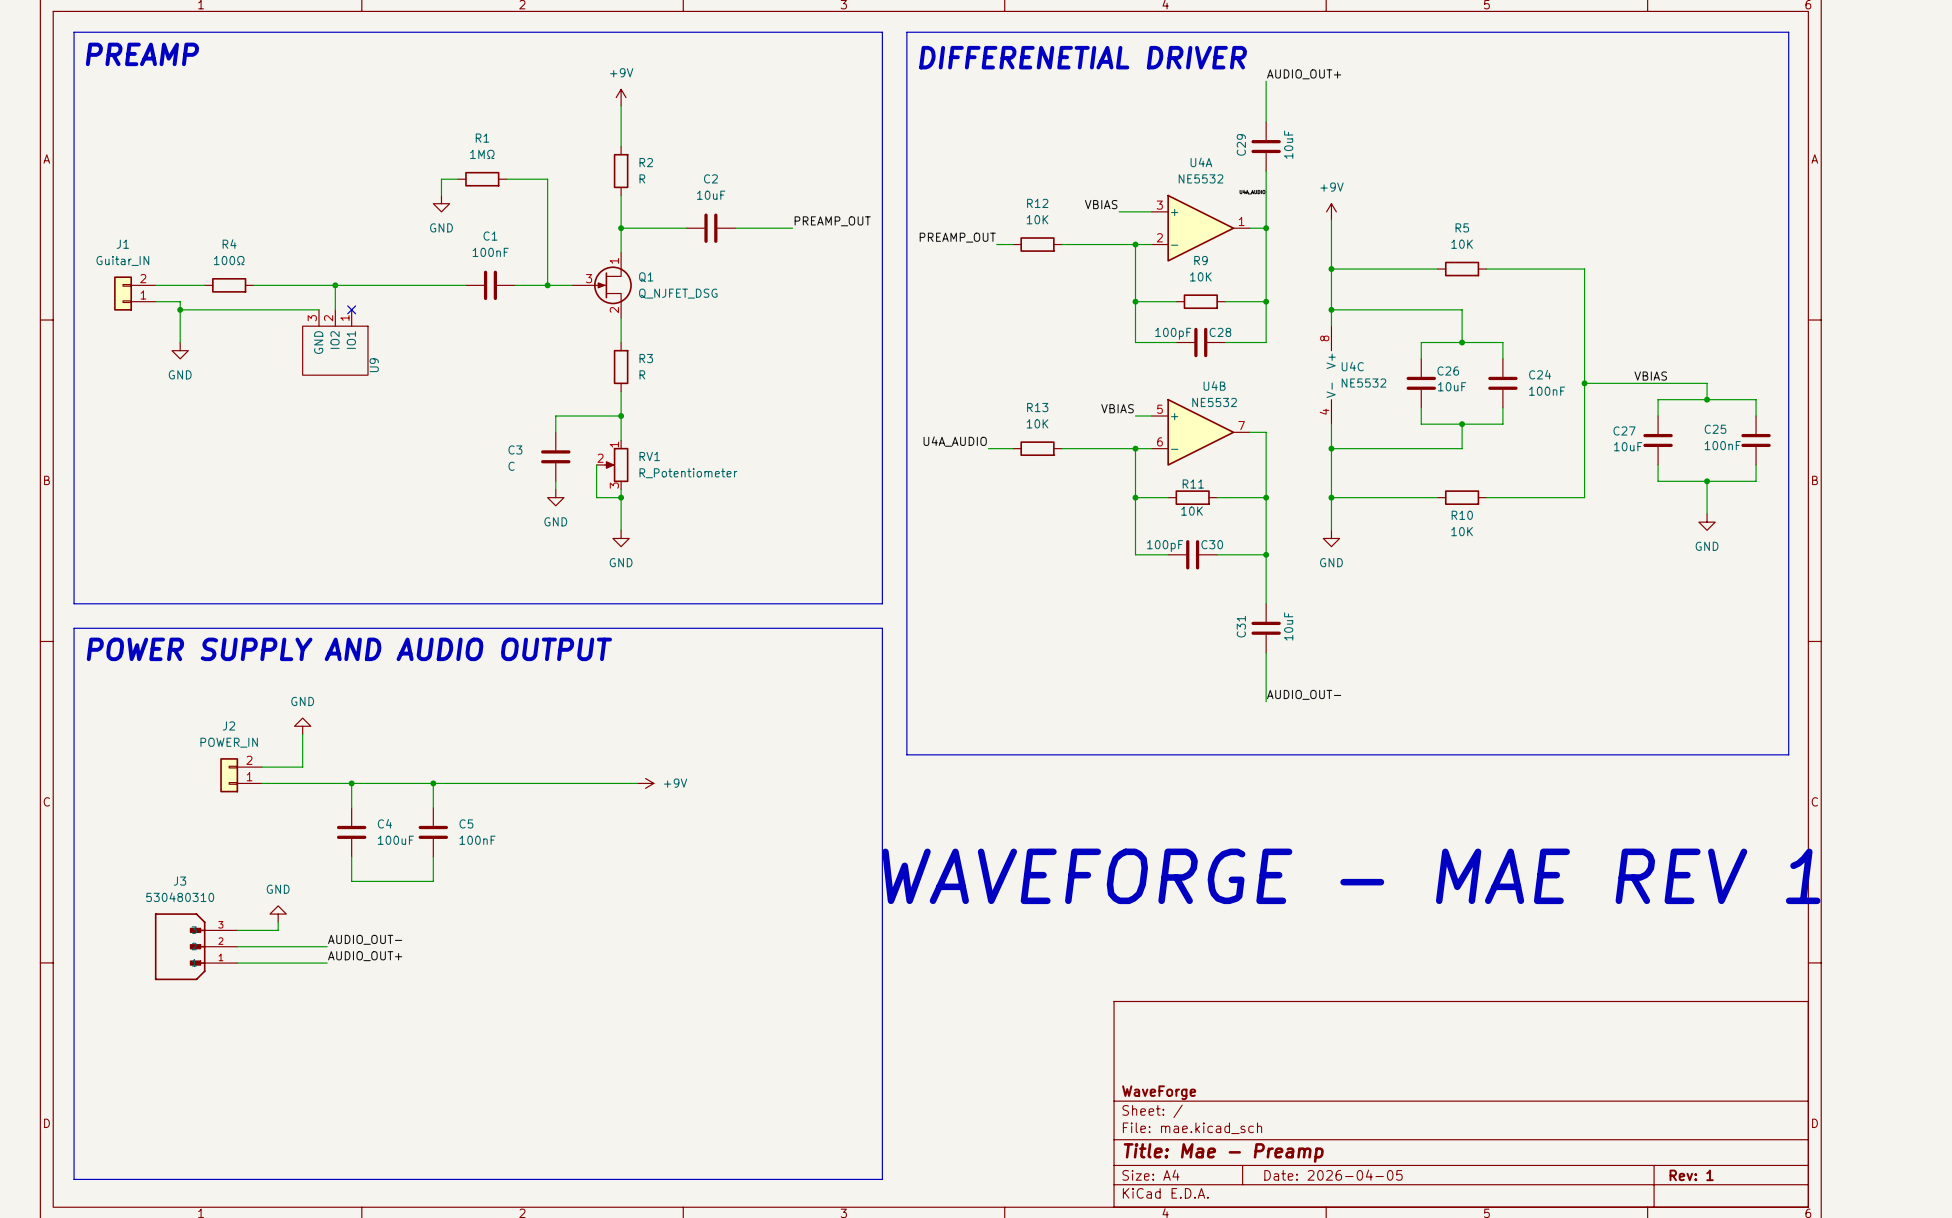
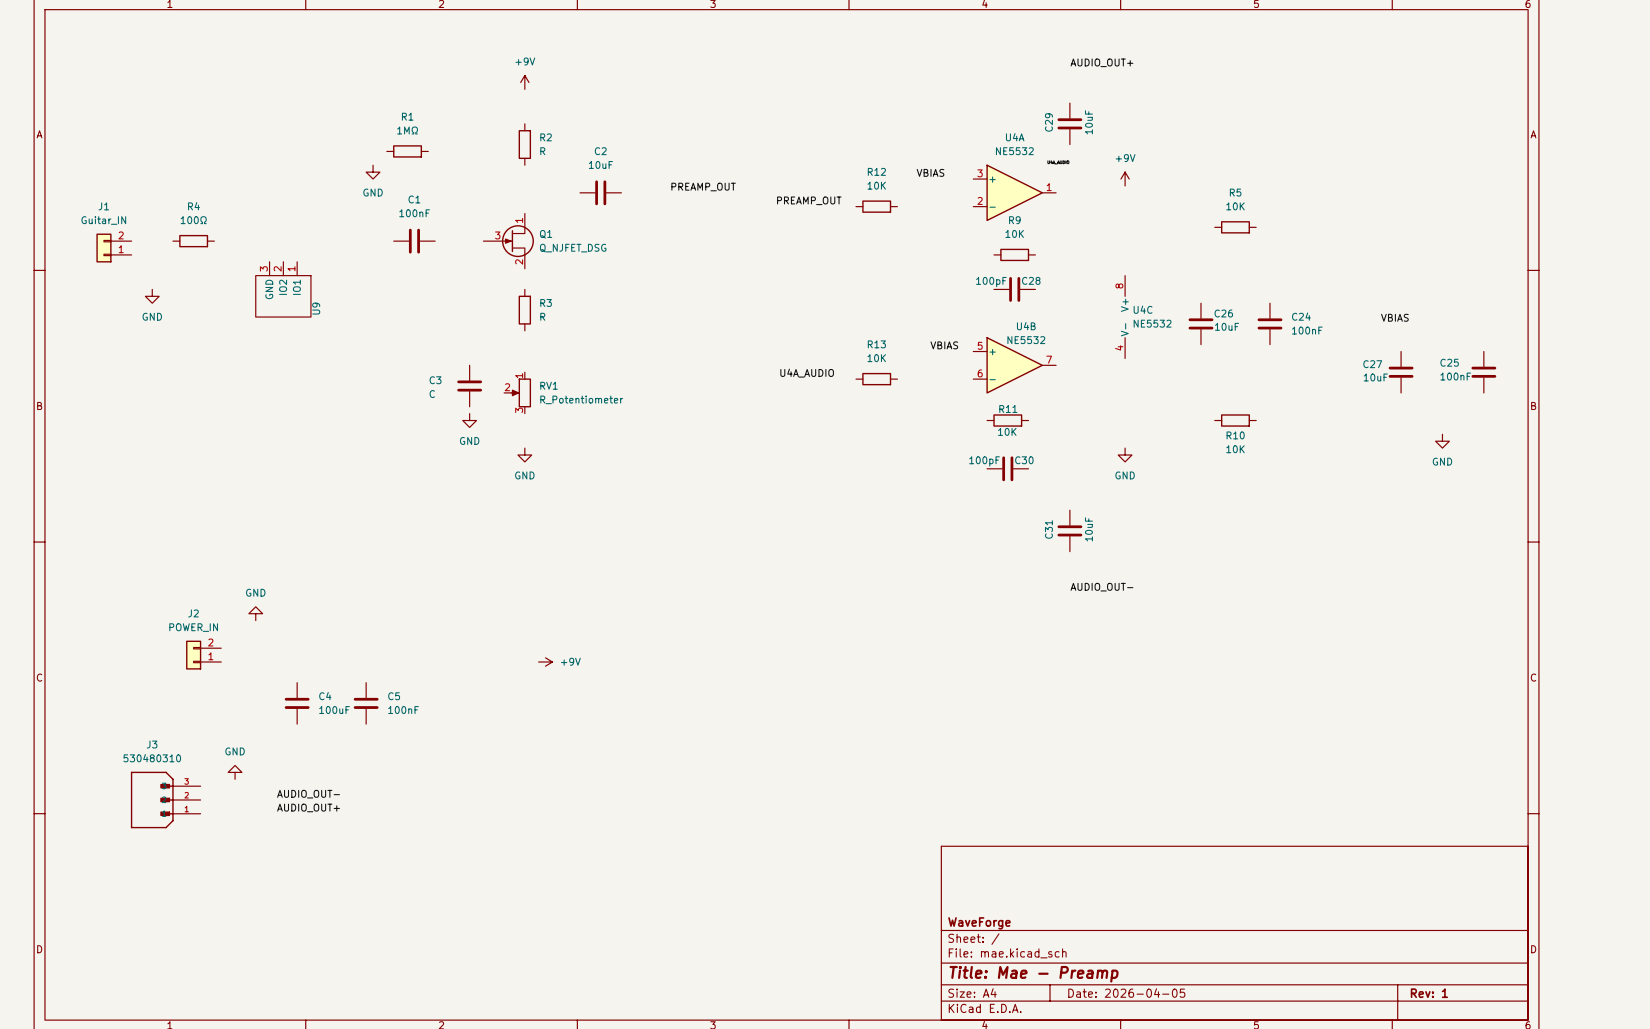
line: (74, 32) (882, 32) (882, 603) (74, 603) (74, 32) -> none
line: (906, 32) (1788, 32) (1788, 754) (906, 754) (906, 32) -> none
text: PREAMP (142, 54) -> none
text: DIFFERENETIAL DRIVER (1083, 57) -> none
wire: (1266, 81) (1266, 122) -> none
wire: (621, 105) (621, 146) -> none
wire: (1266, 171) (1266, 342) (1225, 342) -> none
wire: (457, 179) (441, 179) (441, 195) -> none
wire: (506, 179) (547, 179) (547, 285) -> none
wire: (621, 195) (621, 252) -> none
wire: (1119, 211) (1151, 211) -> none
wire: (1331, 220) (1331, 326) -> none
wire: (621, 228) (686, 228) -> none
junction: (621, 228) -> none
wire: (735, 228) (792, 228) -> none
wire: (1249, 228) (1266, 228) -> none
junction: (1266, 228) -> none
wire: (996, 244) (1013, 244) -> none
wire: (1062, 244) (1151, 244) -> none
wire: (1135, 244) (1135, 342) (1176, 342) -> none
junction: (1135, 244) -> none
wire: (1331, 269) (1437, 269) -> none
junction: (1331, 269) -> none
wire: (1486, 269) (1584, 269) (1584, 497) (1486, 497) -> none
wire: (155, 285) (204, 285) -> none
wire: (253, 285) (465, 285) -> none
wire: (335, 285) (335, 309) -> none
junction: (335, 285) -> none
wire: (514, 285) (572, 285) -> none
junction: (547, 285) -> none
wire: (155, 301) (180, 301) (180, 342) -> none
wire: (1135, 301) (1176, 301) -> none
junction: (1135, 301) -> none
wire: (1225, 301) (1266, 301) -> none
junction: (1266, 301) -> none
wire: (180, 309) (319, 309) -> none
junction: (180, 309) -> none
no-connect mark: (351, 309) -> none
wire: (1331, 309) (1462, 309) (1462, 342) -> none
junction: (1331, 309) -> none
wire: (621, 318) (621, 342) -> none
junction: (1462, 342) -> none
wire: (1421, 358) (1421, 342) (1502, 342) (1502, 358) -> none
wire: (1584, 383) (1707, 383) (1707, 399) -> none
junction: (1584, 383) -> none
wire: (621, 391) (621, 440) -> none
junction: (1707, 399) -> none
wire: (1421, 407) (1421, 424) (1502, 424) (1502, 407) -> none
wire: (621, 416) (555, 416) (555, 432) -> none
junction: (621, 416) -> none
wire: (1135, 416) (1151, 416) -> none
wire: (1658, 416) (1658, 399) (1756, 399) (1756, 416) -> none
wire: (1331, 424) (1331, 530) -> none
wire: (1462, 424) (1462, 448) (1331, 448) -> none
junction: (1462, 424) -> none
wire: (1249, 432) (1266, 432) (1266, 603) -> none
wire: (988, 448) (1013, 448) -> none
wire: (1062, 448) (1151, 448) -> none
wire: (1135, 448) (1135, 554) (1168, 554) -> none
junction: (1135, 448) -> none
junction: (1331, 448) -> none
wire: (596, 464) (596, 497) (621, 497) -> none
wire: (1658, 464) (1658, 481) (1756, 481) (1756, 464) -> none
wire: (555, 481) (555, 489) -> none
wire: (1707, 481) (1707, 513) -> none
junction: (1707, 481) -> none
wire: (621, 489) (621, 530) -> none
junction: (621, 497) -> none
wire: (1135, 497) (1168, 497) -> none
junction: (1135, 497) -> none
wire: (1217, 497) (1266, 497) -> none
junction: (1266, 497) -> none
wire: (1331, 497) (1437, 497) -> none
junction: (1331, 497) -> none
wire: (1217, 554) (1266, 554) -> none
junction: (1266, 554) -> none
line: (74, 628) (74, 1179) (882, 1179) (882, 628) (74, 628) -> none
text: POWER SUPPLY AND AUDIO OUTPUT (349, 649) -> none
wire: (1266, 652) (1266, 701) -> none
wire: (302, 734) (302, 767) (261, 767) -> none
wire: (261, 783) (637, 783) -> none
wire: (351, 783) (351, 807) -> none
junction: (351, 783) -> none
wire: (433, 783) (433, 807) -> none
junction: (433, 783) -> none
wire: (351, 856) (351, 881) (433, 881) (433, 856) -> none
text: WAVEFORGE - MAE REV 1 (1351, 876) -> none
wire: (278, 922) (278, 930) (237, 930) -> none
wire: (237, 946) (327, 946) -> none
wire: (237, 963) (327, 963) -> none

